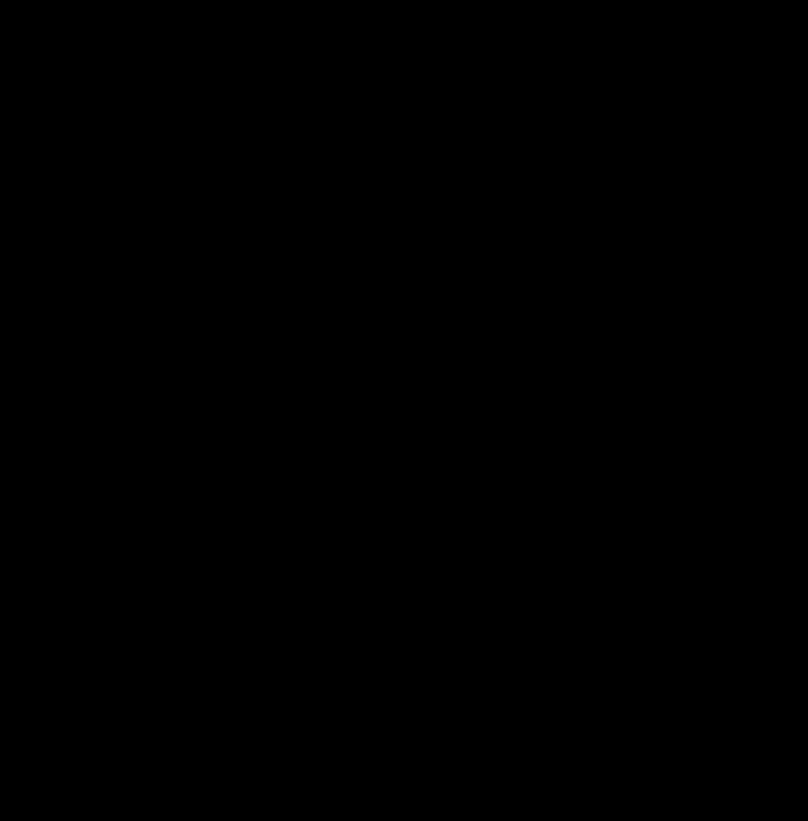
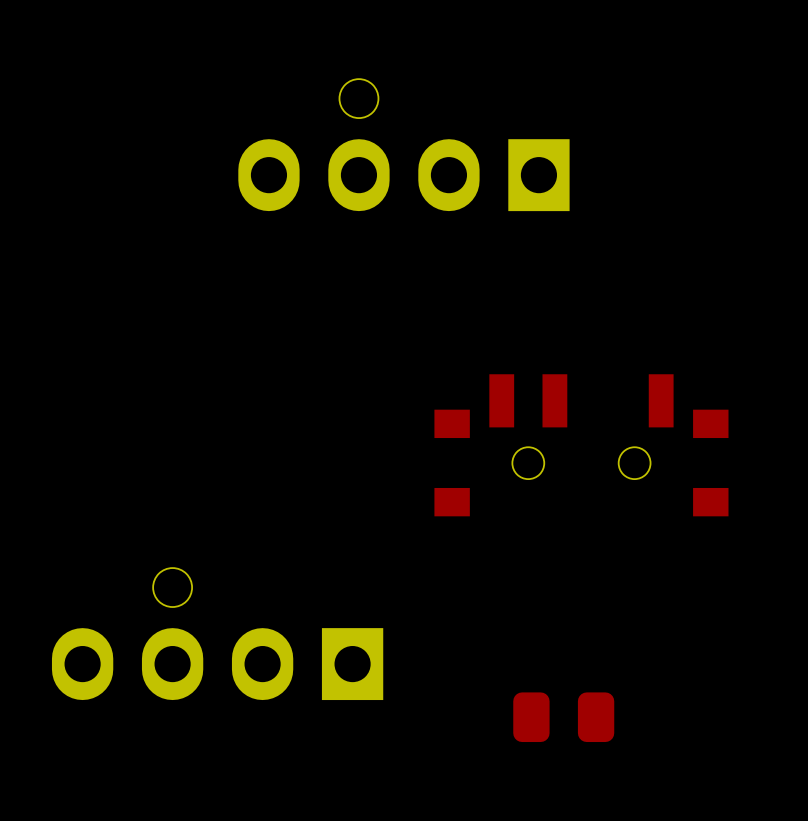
part: none -> (403, 145)
part: none -> (581, 445)
part: none -> (217, 634)
part: none -> (563, 717)

